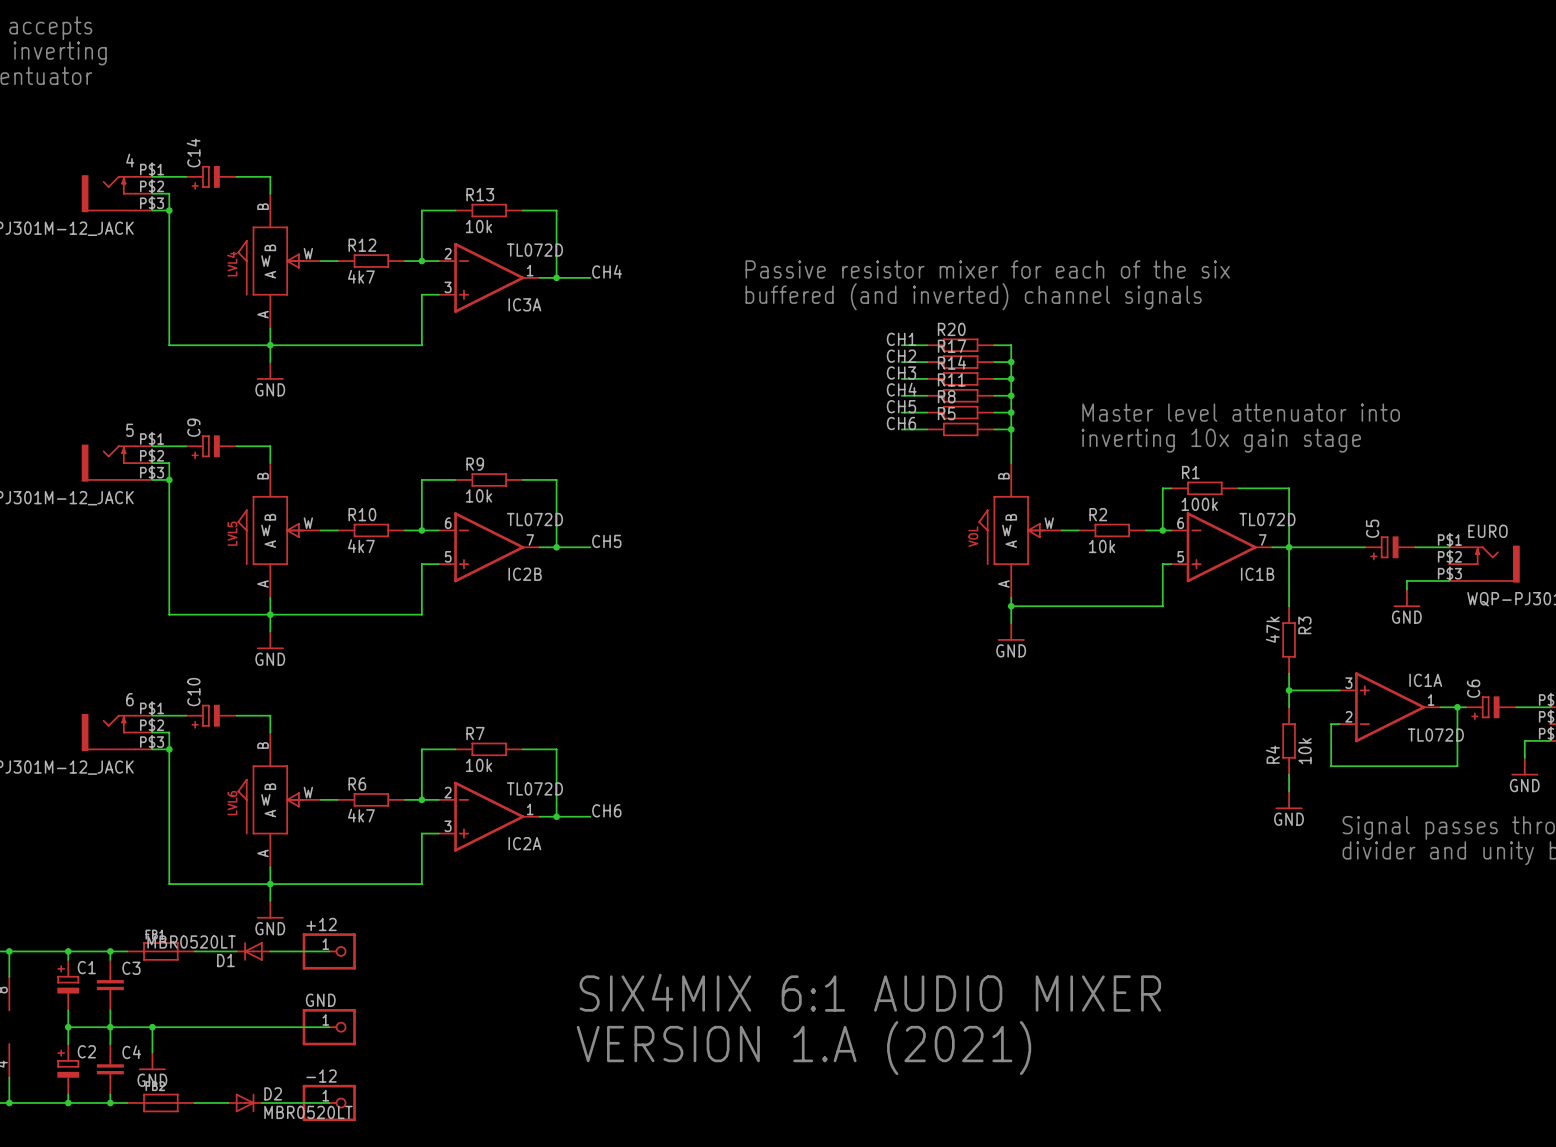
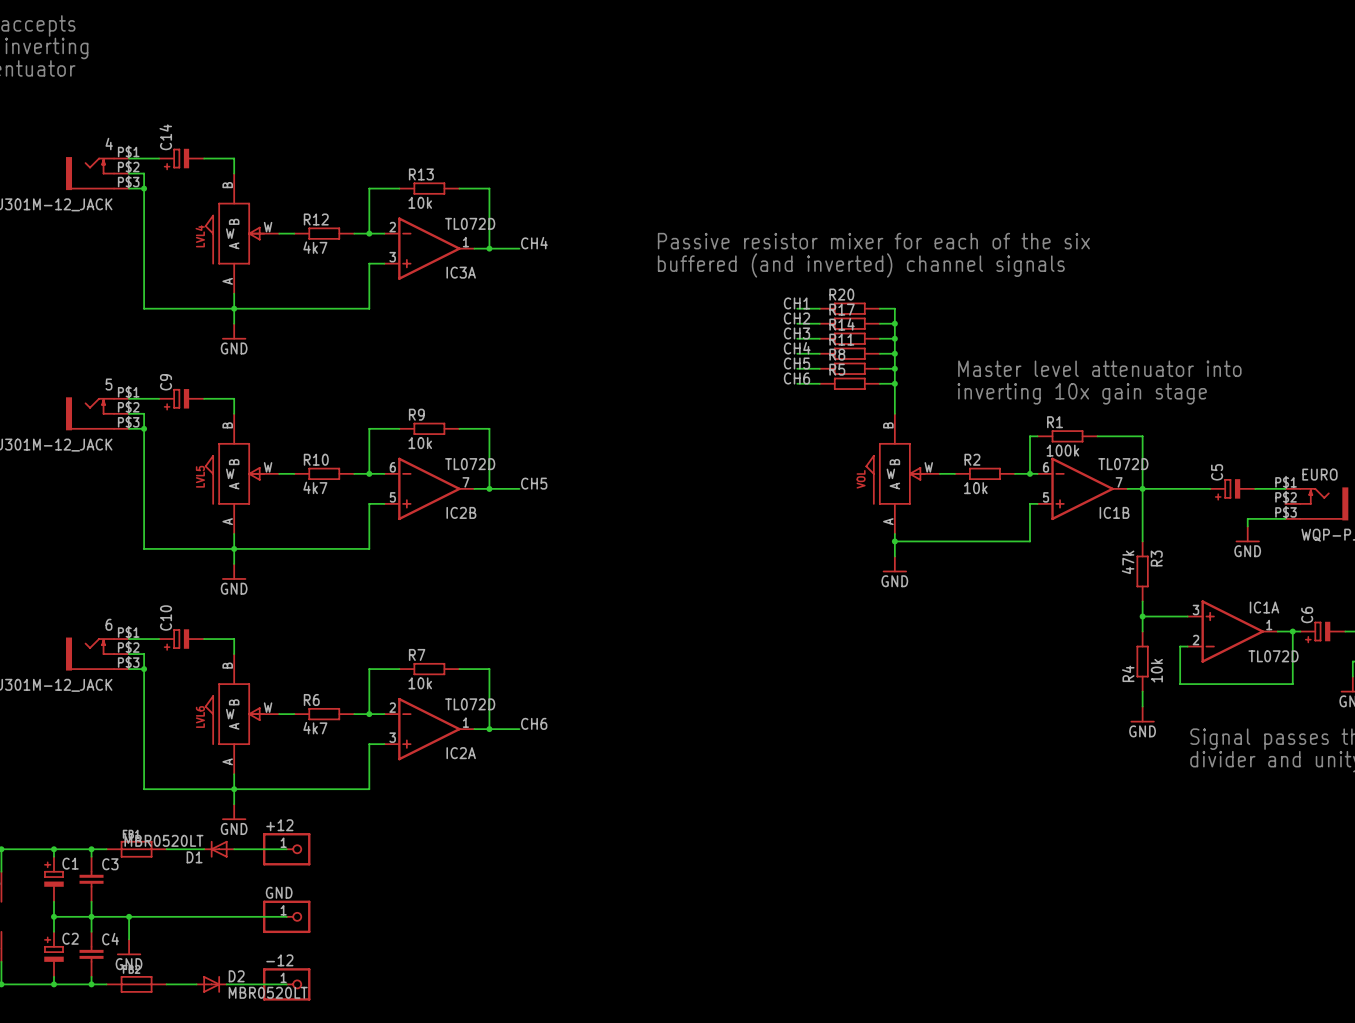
text: SIX4MIX 6:1 AUDIO MIXER (870, 992) -> none
text: VERSION 1.A (2021) (803, 1048) -> none

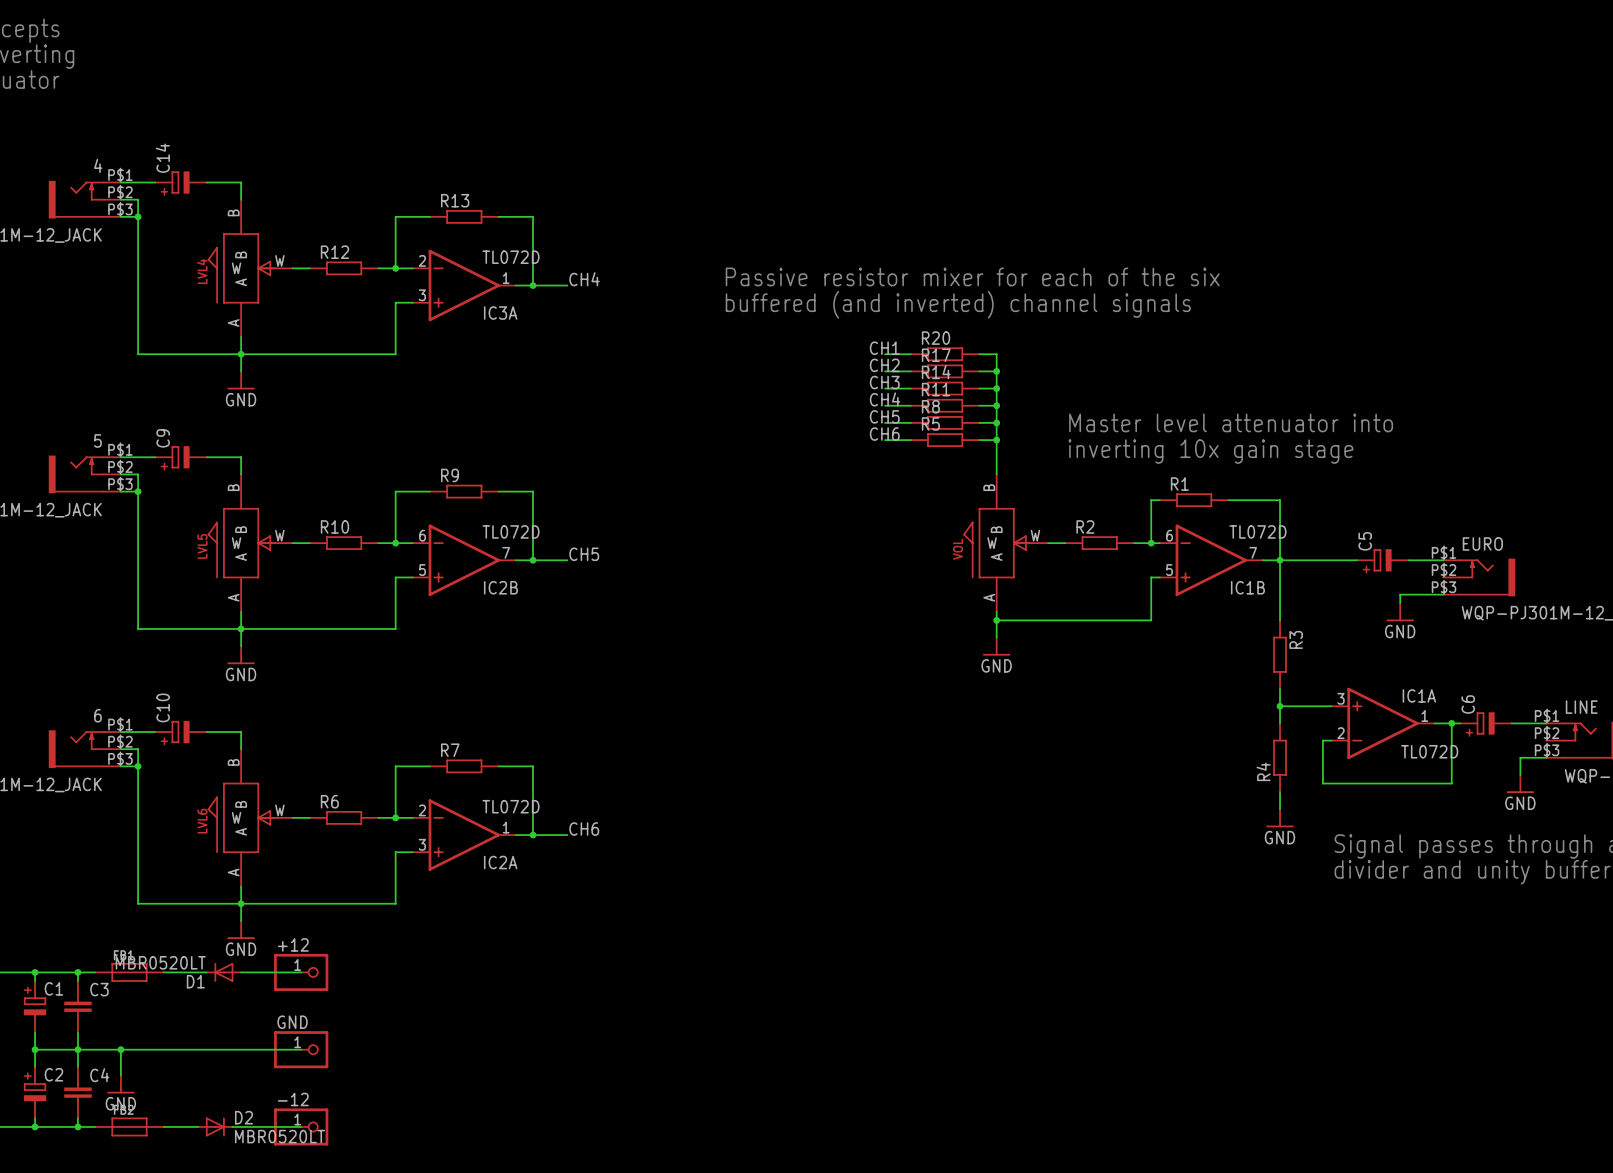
R13 value: 10k (420, 202) -> none
R12 value: 4k7 (315, 247) -> none
R9 value: 10k (420, 443) -> none
R1 value: 100k (1062, 450) -> none
R10 value: 4k7 (315, 487) -> none
R2 value: 10k (975, 488) -> none
R3 value: 47k (1128, 562) -> none
R4 value: 10k (1156, 670) -> none
R7 value: 10k (420, 683) -> none
R6 value: 4k7 (315, 728) -> none

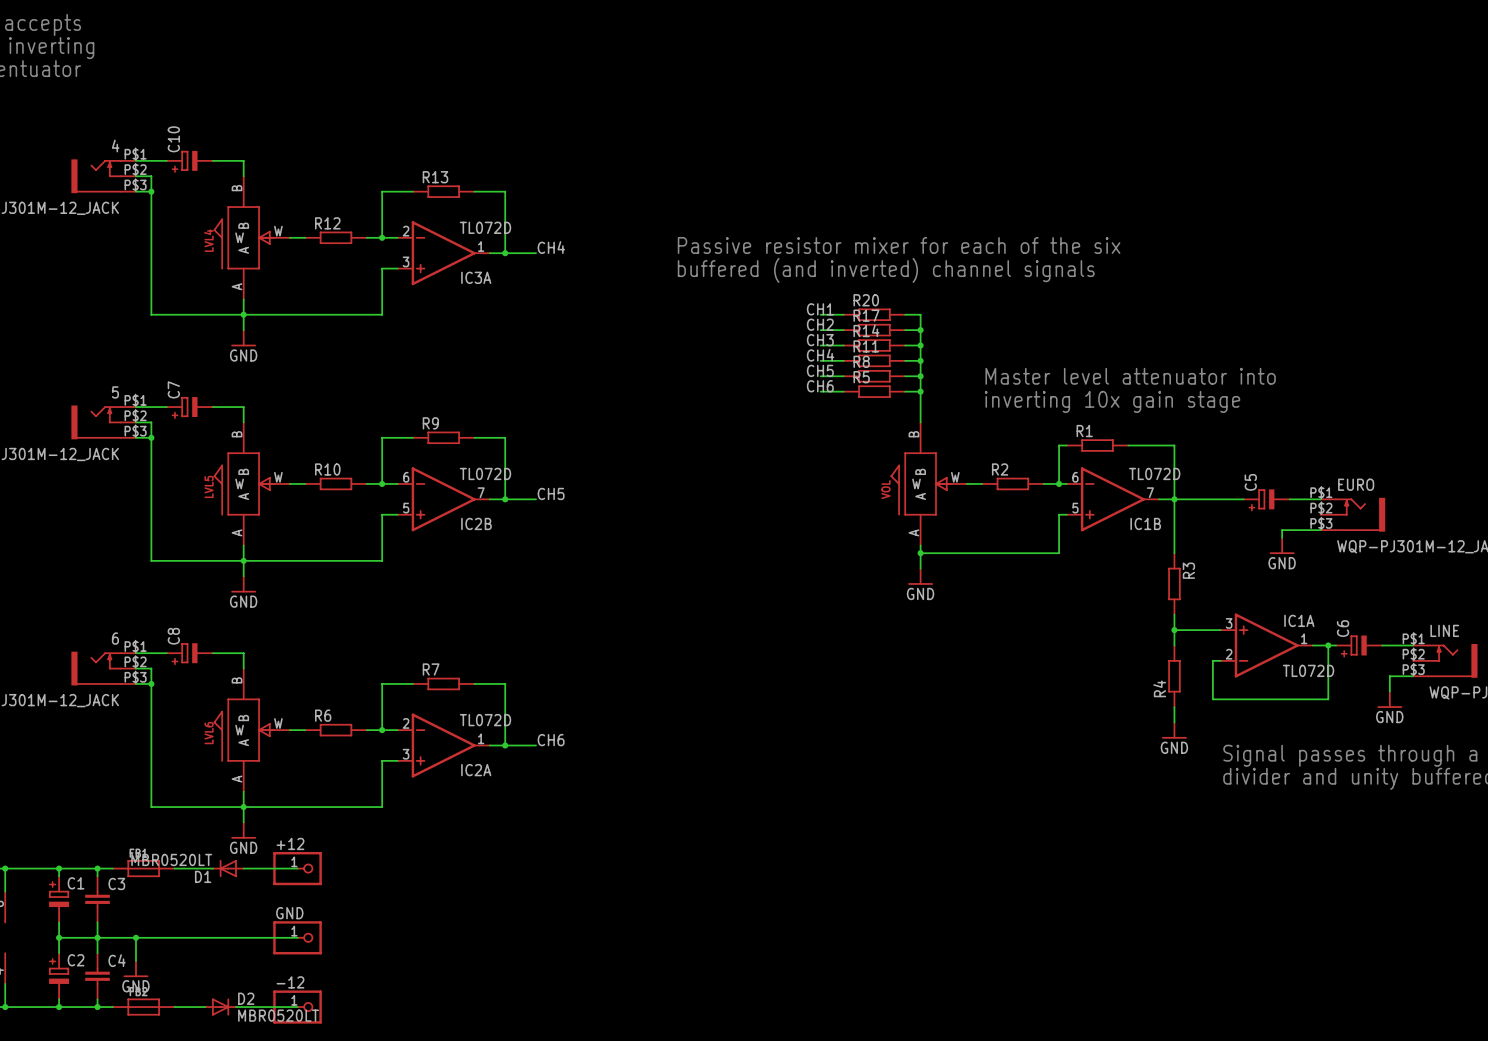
C14 name: C14 (162, 158) -> C10 (173, 139)
C9 name: C9 (163, 438) -> C7 (173, 389)
C10 name: C10 (163, 707) -> C8 (173, 636)

